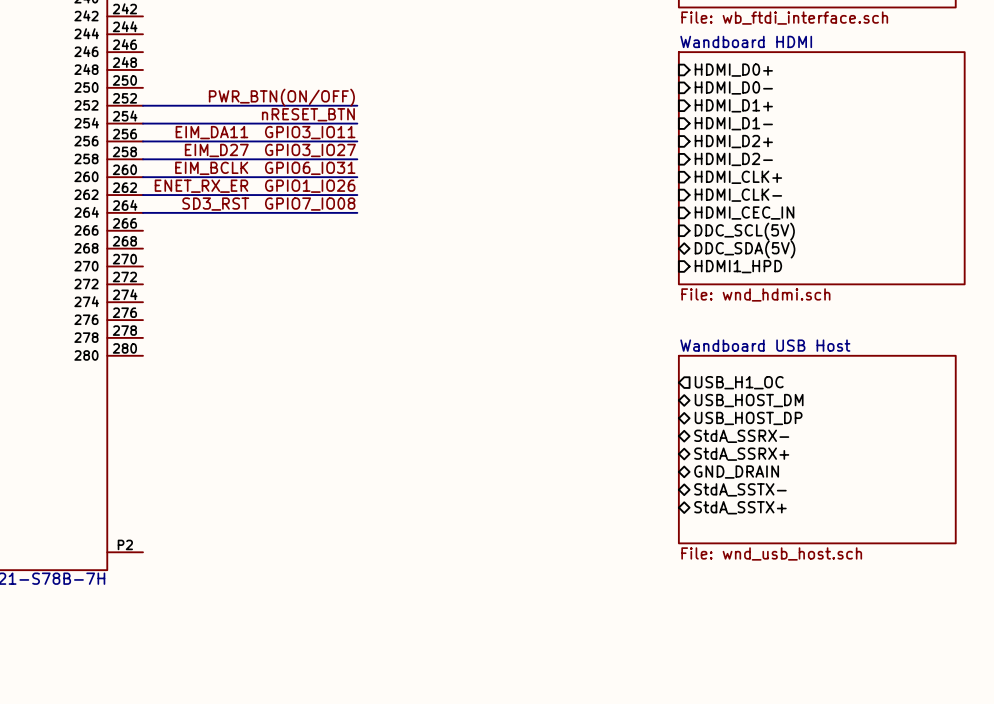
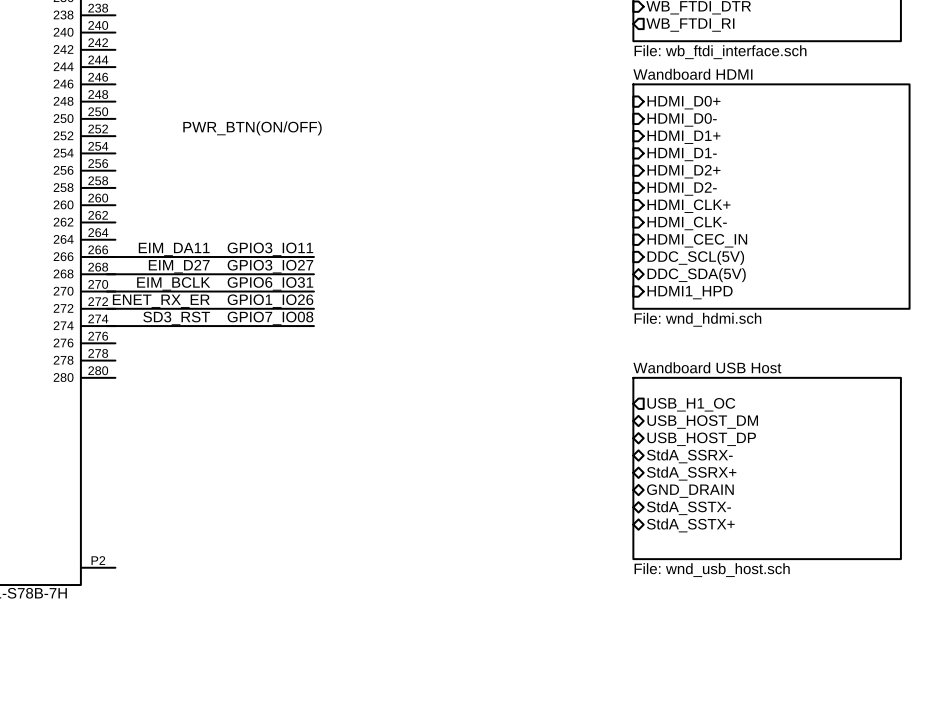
wire: (142, 105) (357, 105) -> none
label: nRESET_BTN (308, 114) -> none
wire: (142, 123) (357, 123) -> none
label position: EIM_DA11 (211, 132) -> EIM_DA11 (174, 249)
label position: GPIO3_IO11 (310, 132) -> GPIO3_IO11 (270, 249)
wire: (142, 141) (357, 141) -> (106, 257) (313, 257)
label position: EIM_D27 (216, 150) -> EIM_D27 (179, 266)
label position: GPIO3_IO27 (310, 150) -> GPIO3_IO27 (270, 266)
wire: (142, 159) (357, 159) -> (106, 274) (313, 274)
label position: EIM_BCLK (211, 168) -> EIM_BCLK (173, 283)
label position: GPIO6_IO31 (310, 168) -> GPIO6_IO31 (270, 283)
wire: (142, 177) (357, 177) -> (106, 291) (313, 291)
label position: ENET_RX_ER (201, 186) -> ENET_RX_ER (161, 301)
label position: GPIO1_IO26 (310, 186) -> GPIO1_IO26 (270, 301)
wire: (142, 195) (357, 195) -> (106, 308) (313, 308)
label position: SD3_RST (215, 204) -> SD3_RST (176, 318)
label position: GPIO7_IO08 (310, 204) -> GPIO7_IO08 (270, 318)
wire: (142, 212) (357, 212) -> (106, 326) (313, 326)

